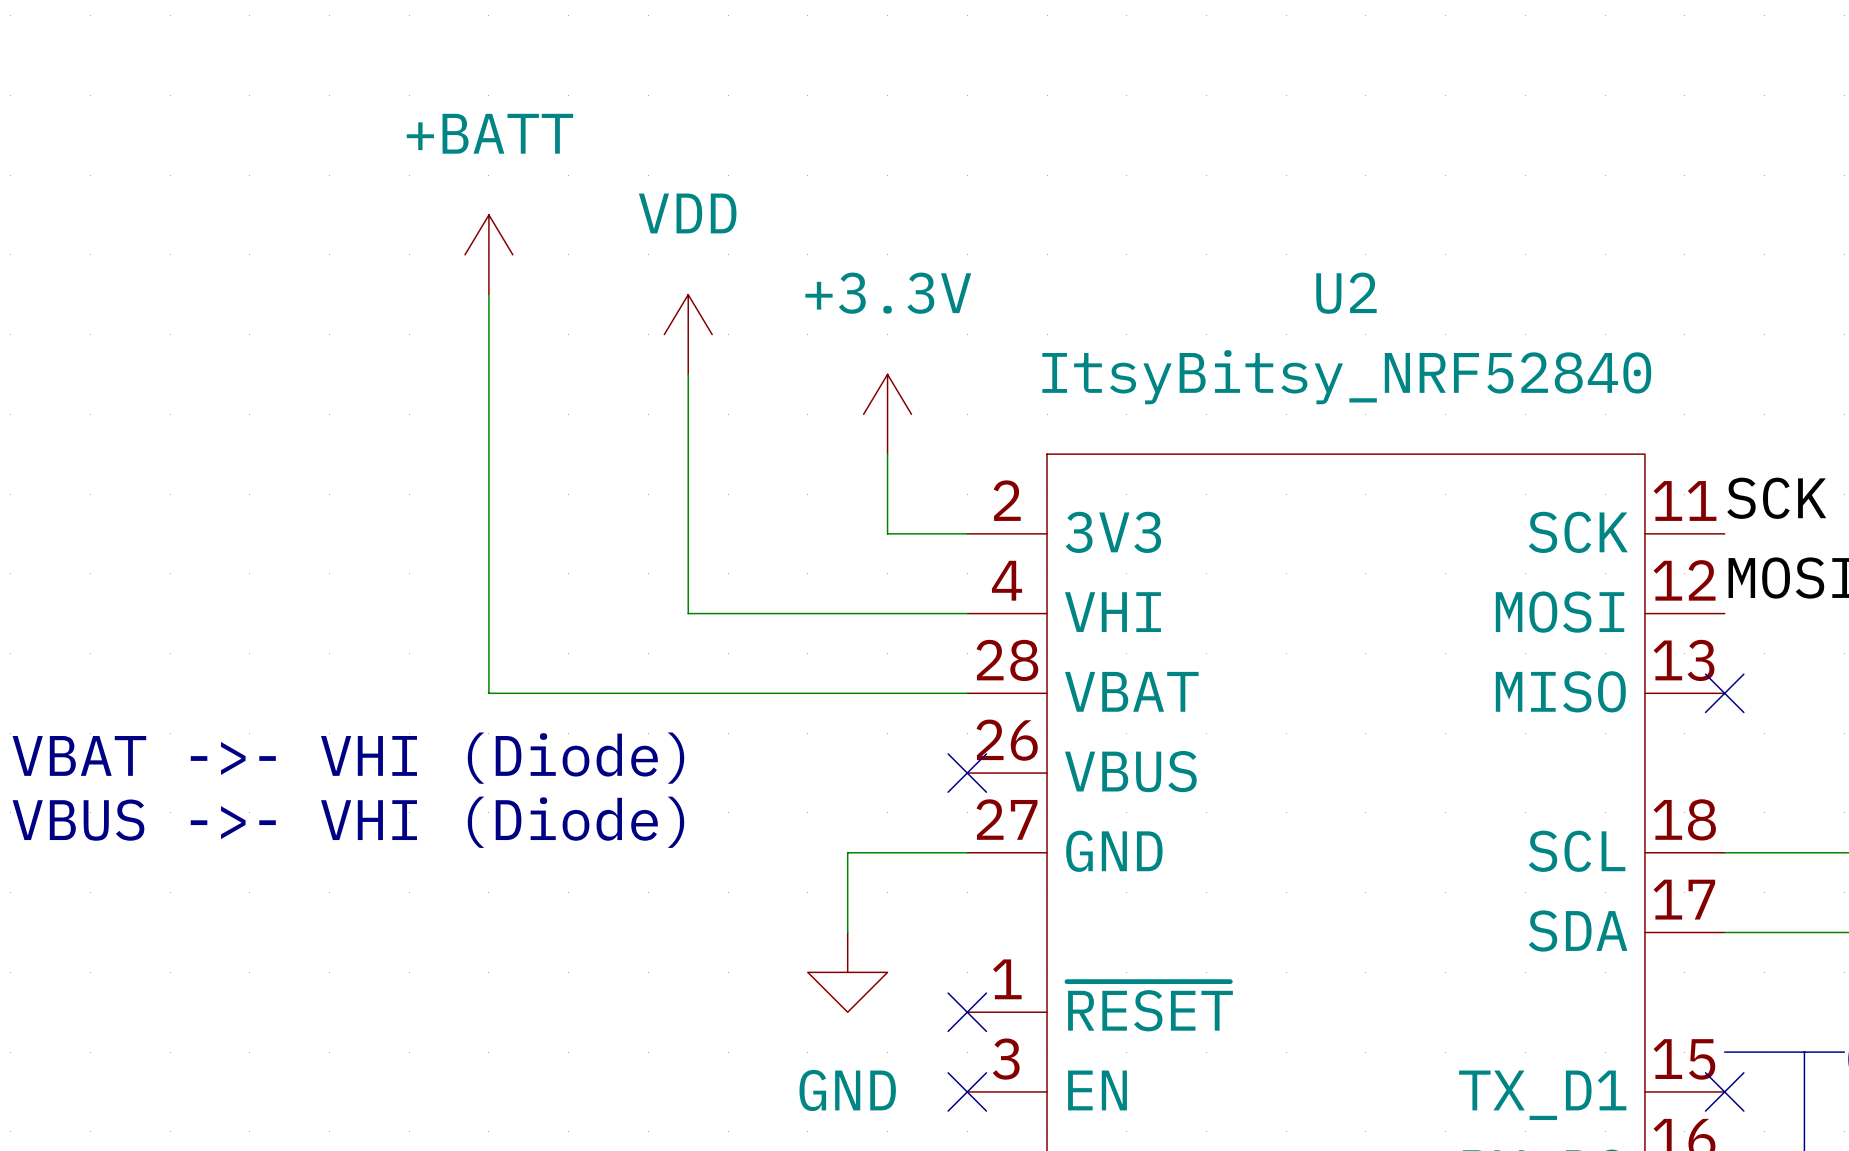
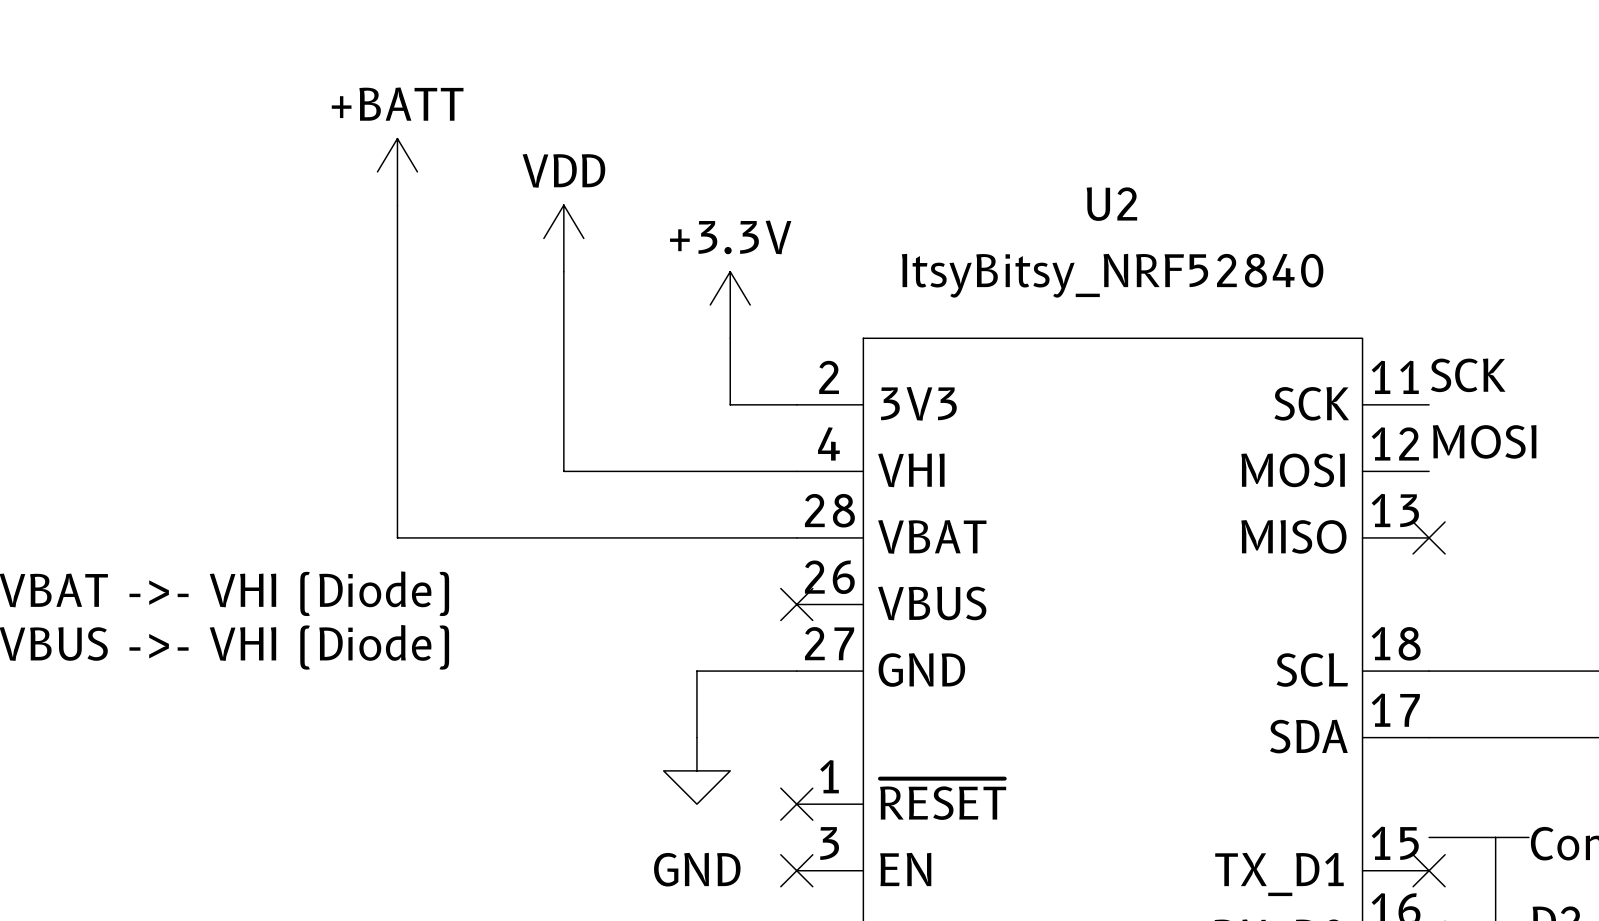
power symbol text position: +BATT (489, 133) -> +BATT (397, 104)
power symbol text position: VDD (687, 213) -> VDD (563, 170)
power symbol text position: +3.3V (888, 293) -> +3.3V (730, 237)

